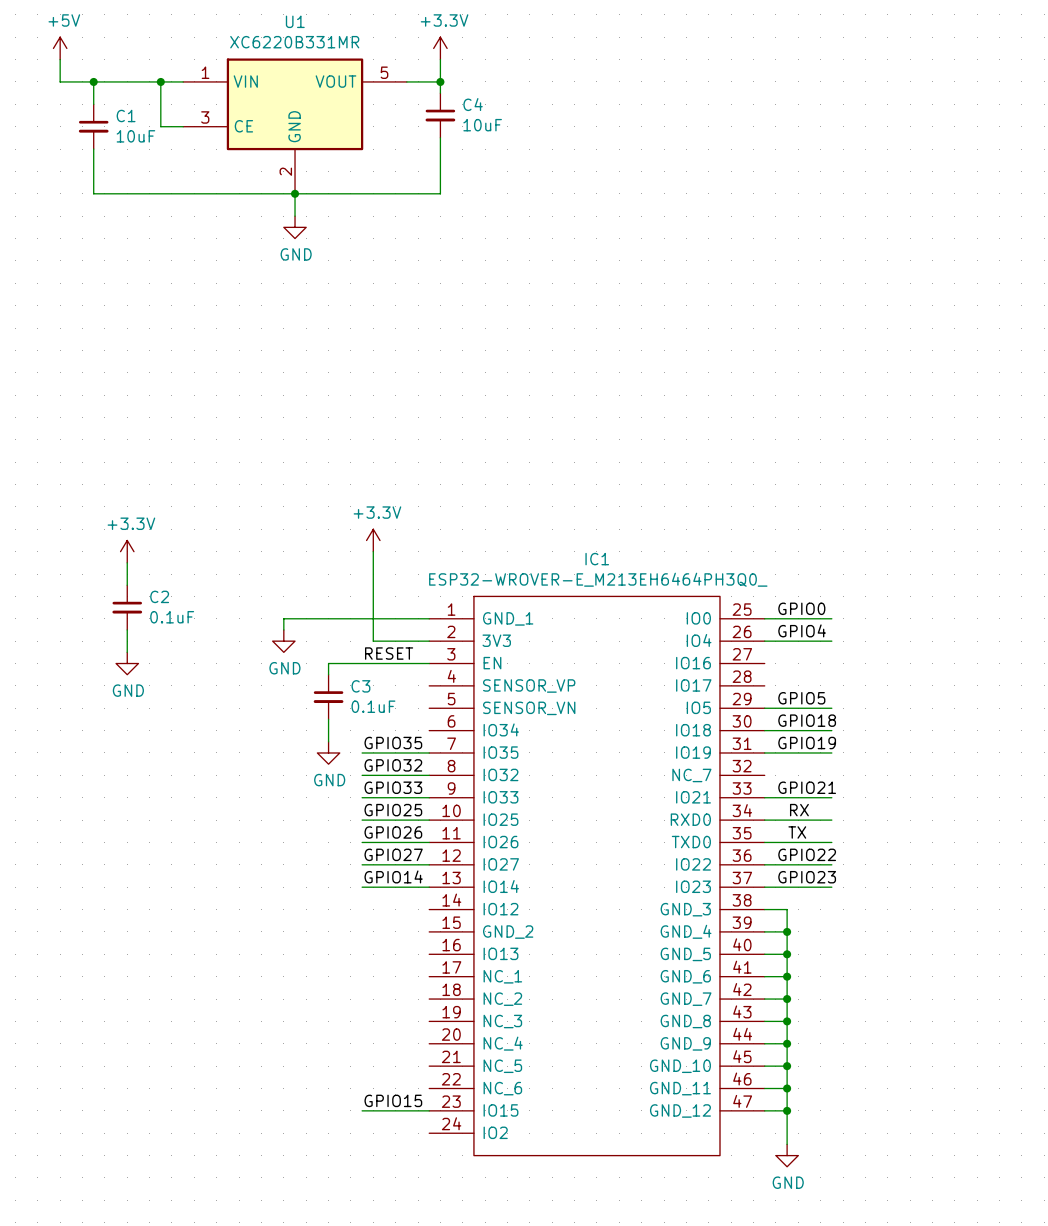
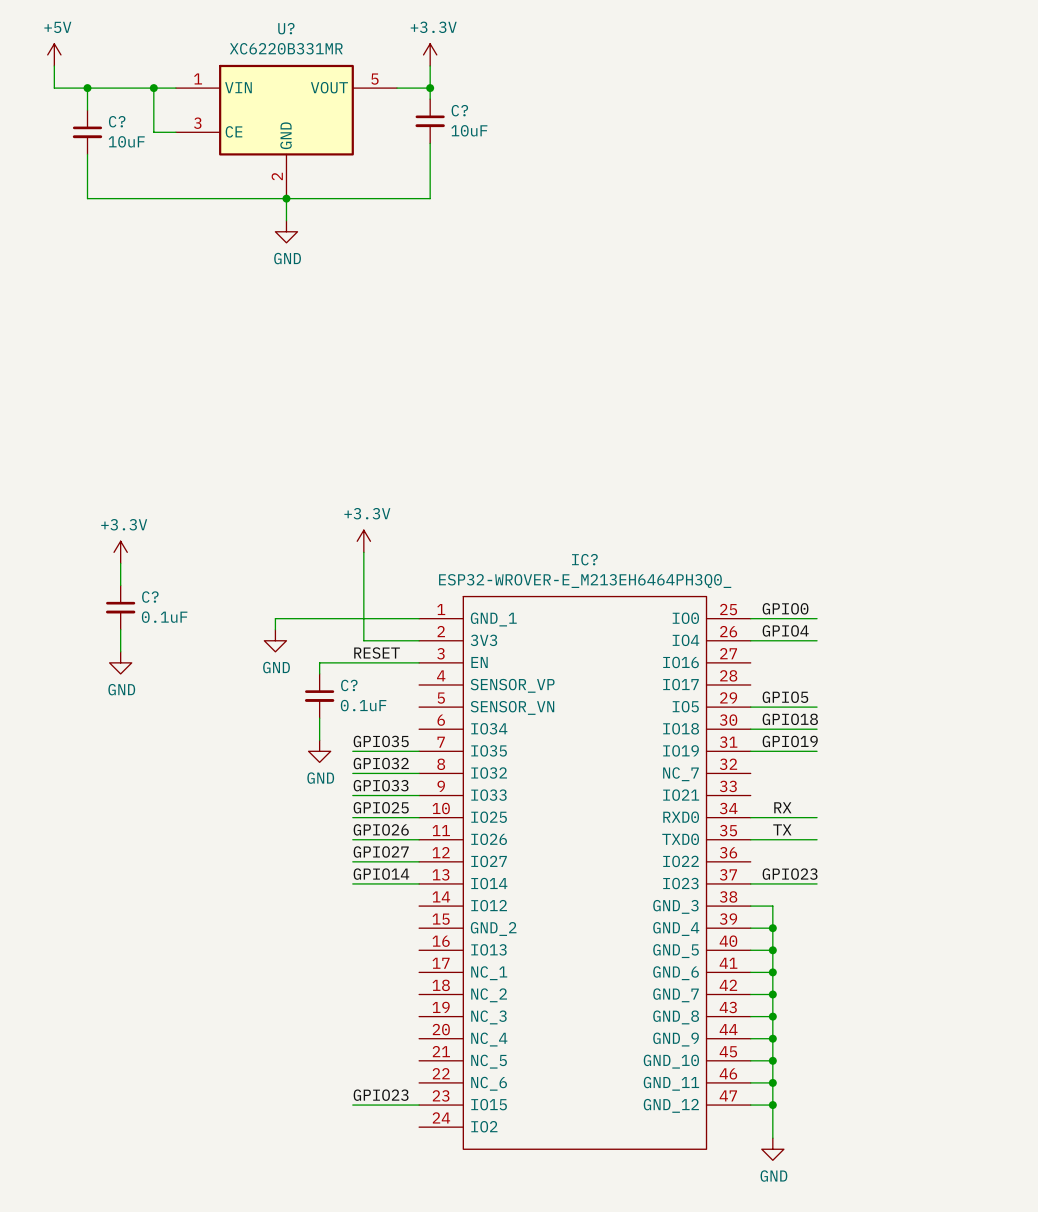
U1 name: U1 (295, 21) -> U? (286, 28)
C4 name: C4 (473, 104) -> C? (459, 110)
C1 name: C1 (126, 115) -> C? (117, 121)
IC1 name: IC1 (597, 559) -> IC? (584, 559)
C2 name: C2 (159, 596) -> C? (150, 597)
C3 name: C3 (360, 686) -> C? (349, 685)
label: GPIO21 (807, 787) -> none
wire: (764, 797) (831, 797) -> none
label: GPIO22 (807, 854) -> none
wire: (764, 864) (831, 864) -> none
label: GPIO15 (393, 1100) -> GPIO23 (381, 1095)

